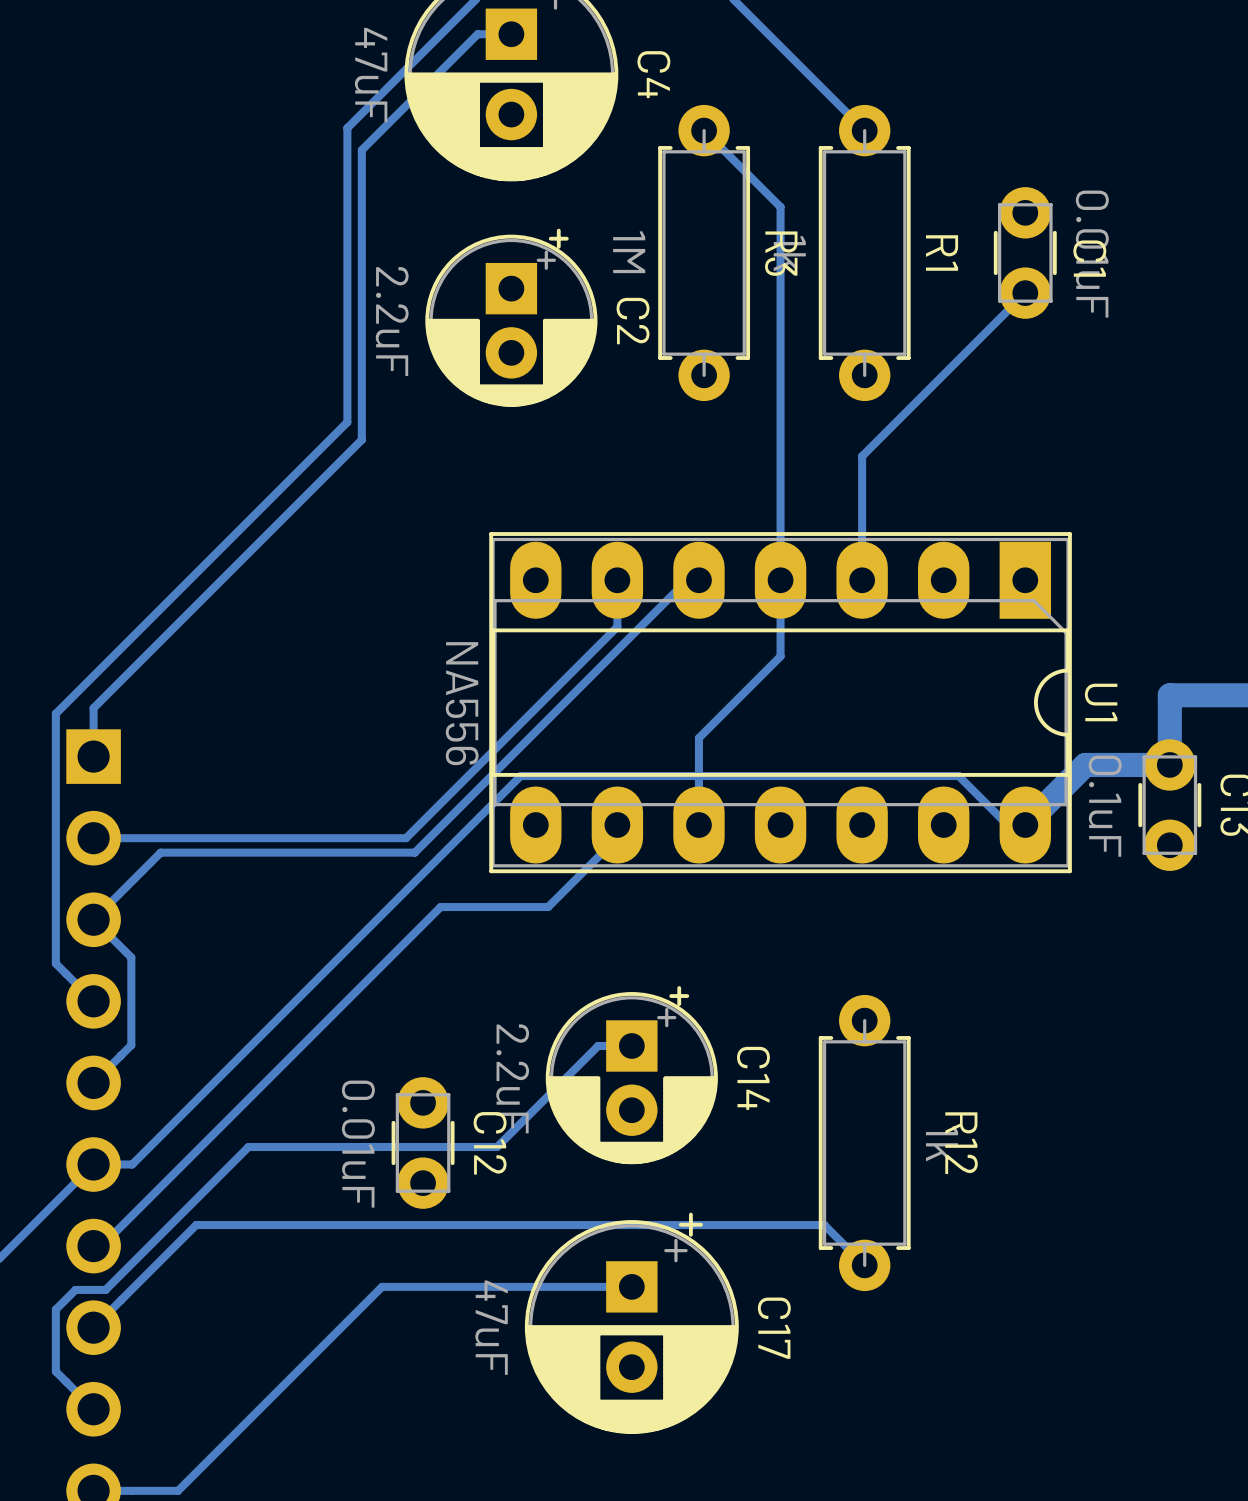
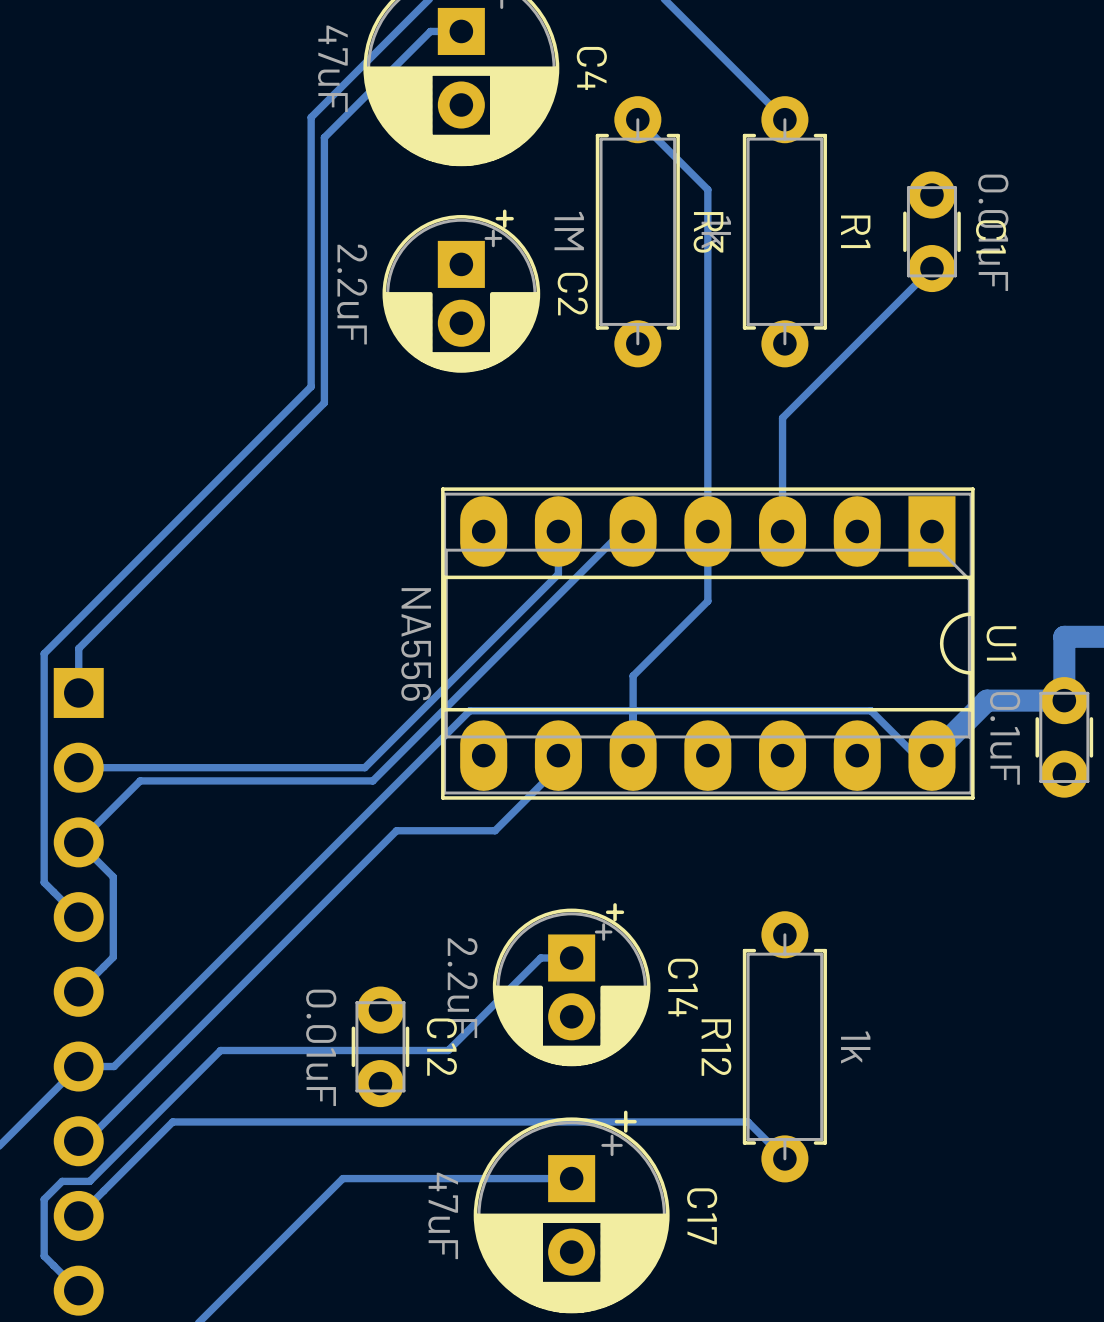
R12 name position: R12 (961, 1143) -> R12 (716, 1047)

